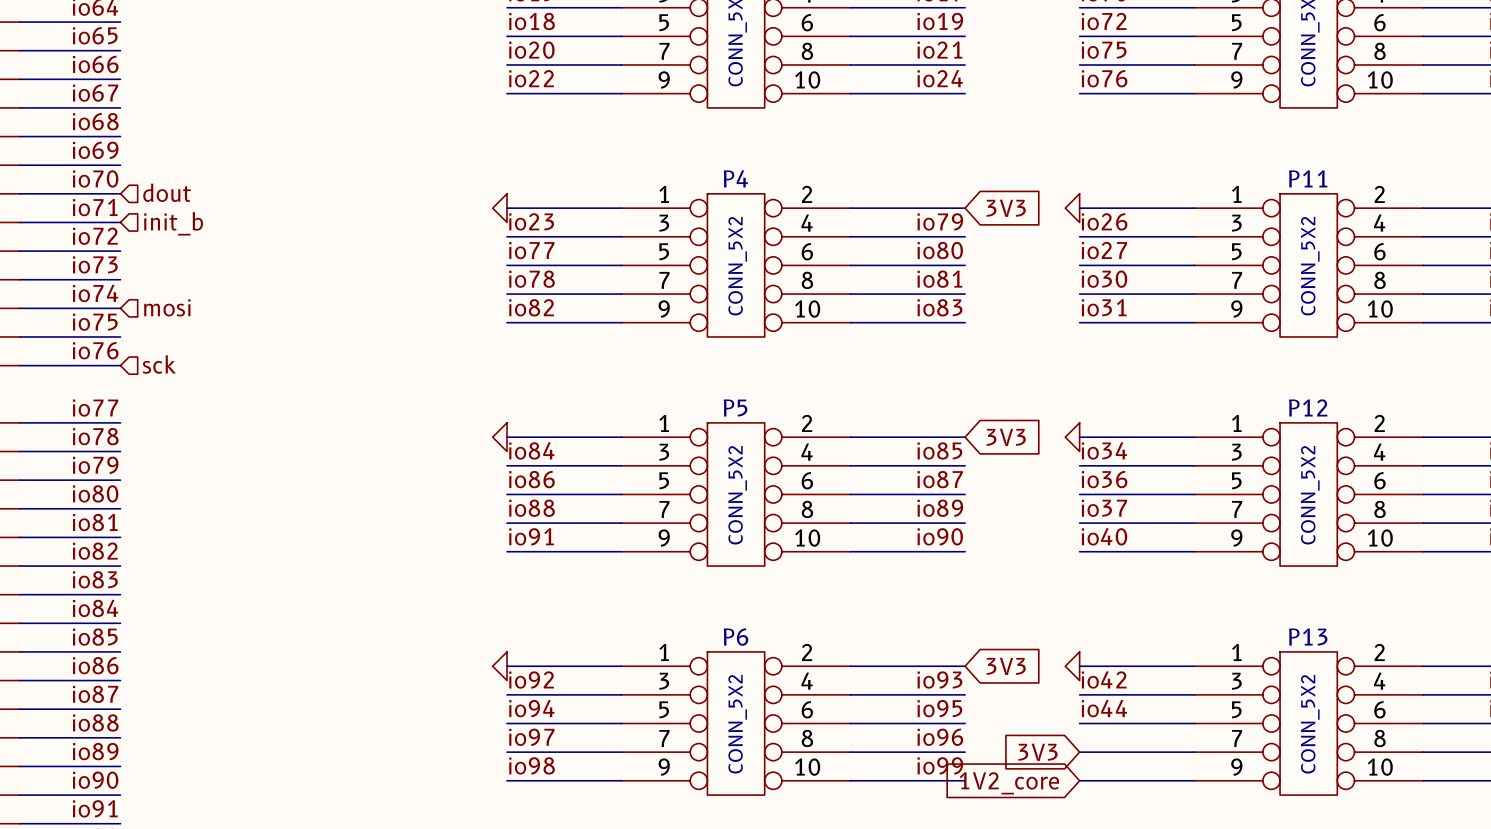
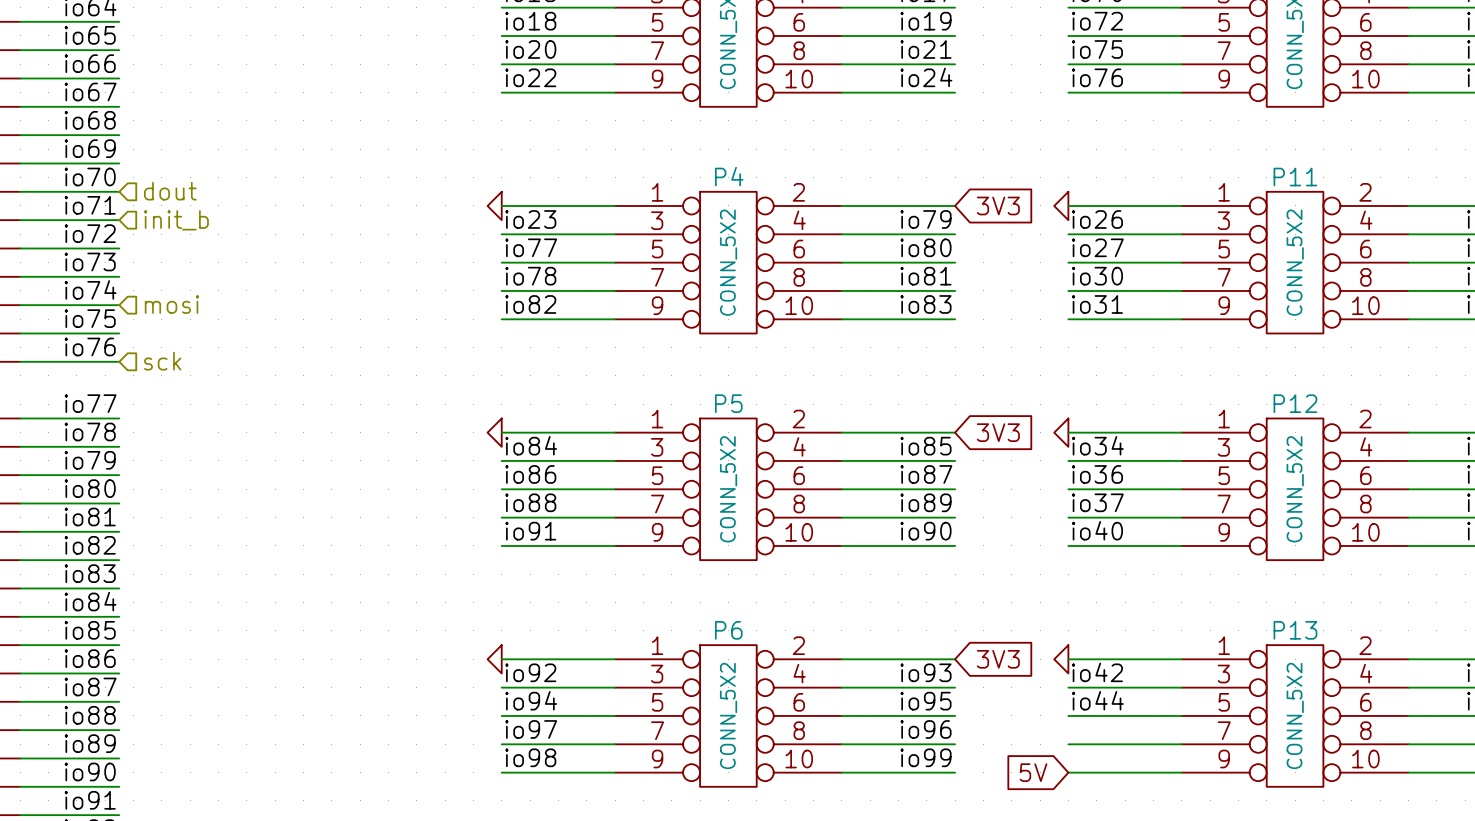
global label: 3V3 (1038, 752) -> none
global label: 1V2_core (1009, 783) -> 5V (1033, 772)

